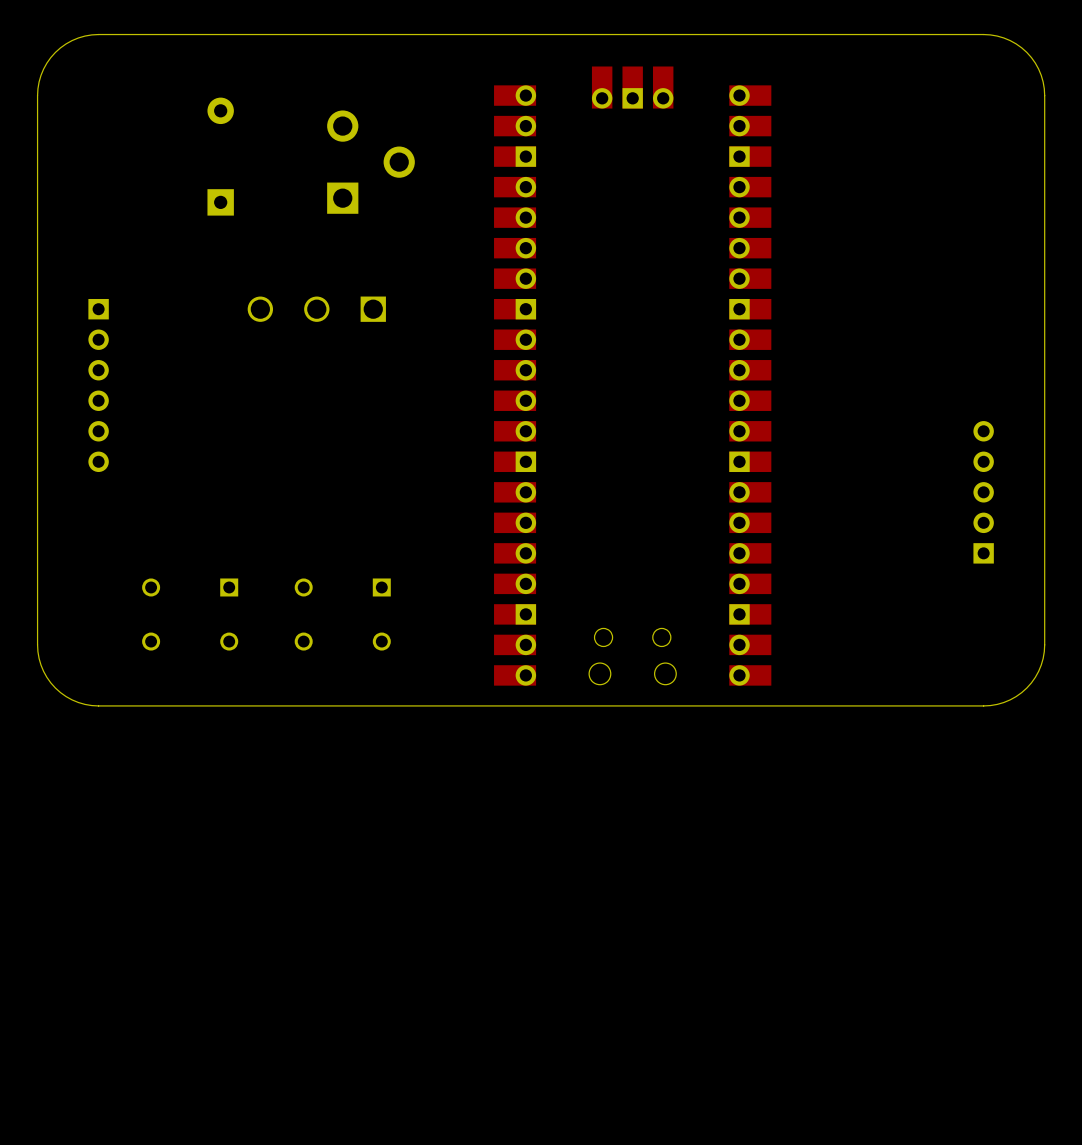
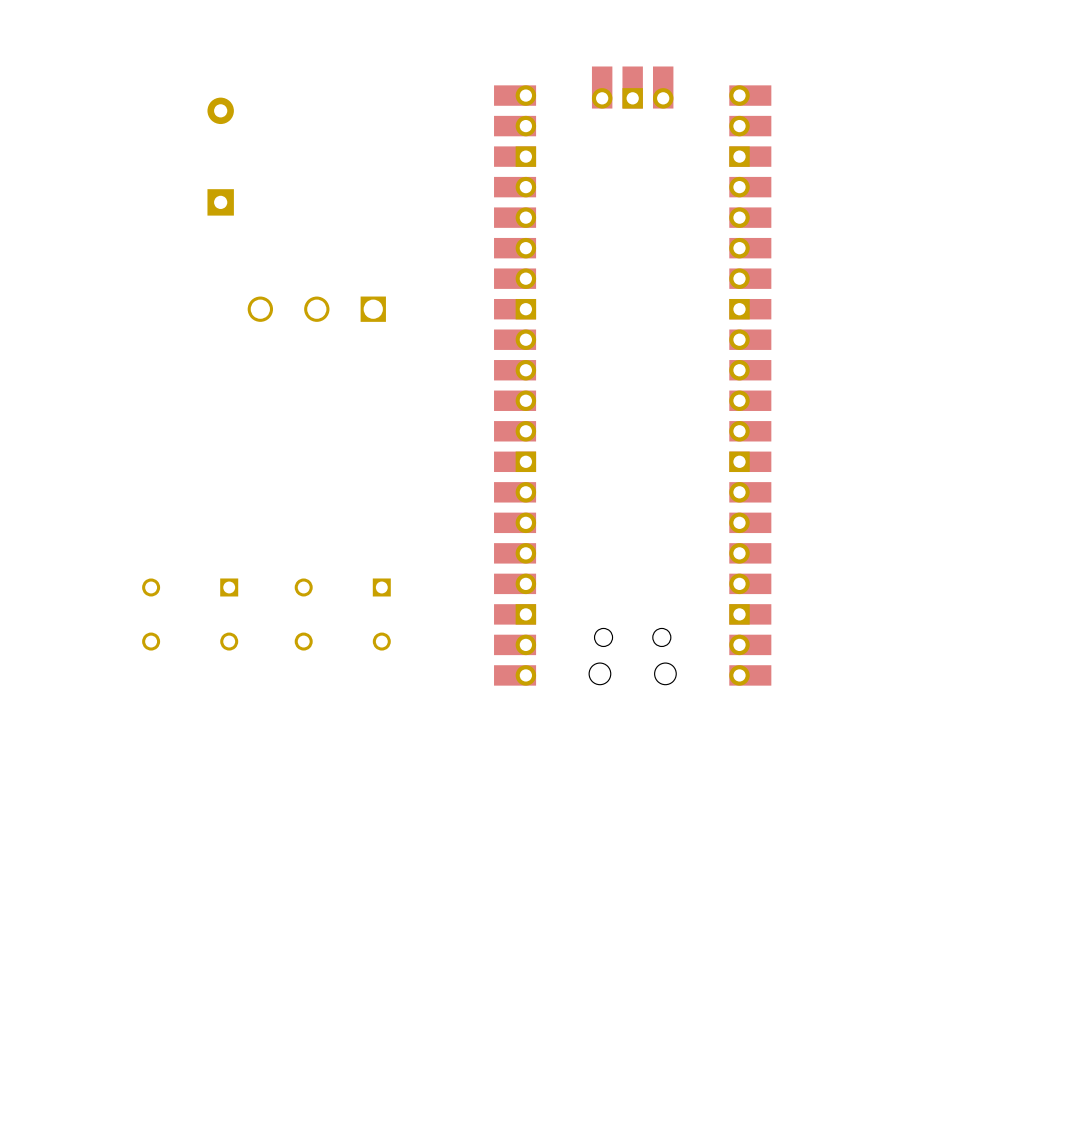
board edge: (983, 34) (98, 34) (78, 37) (66, 43) (50, 57) (43, 69) (39, 81) (37, 95) (37, 644) (39, 658) (46, 677) (55, 688) (66, 696) (78, 702) (98, 705) (983, 705) (997, 704) (1016, 696) (1031, 682) (1038, 671) (1043, 658) (1044, 644) (1044, 95) (1041, 75) (1035, 63) (1026, 52) (1010, 40) (997, 36) (983, 34) -> none
part: (370, 162) -> none
part: (98, 385) -> none
part: (983, 492) -> none

